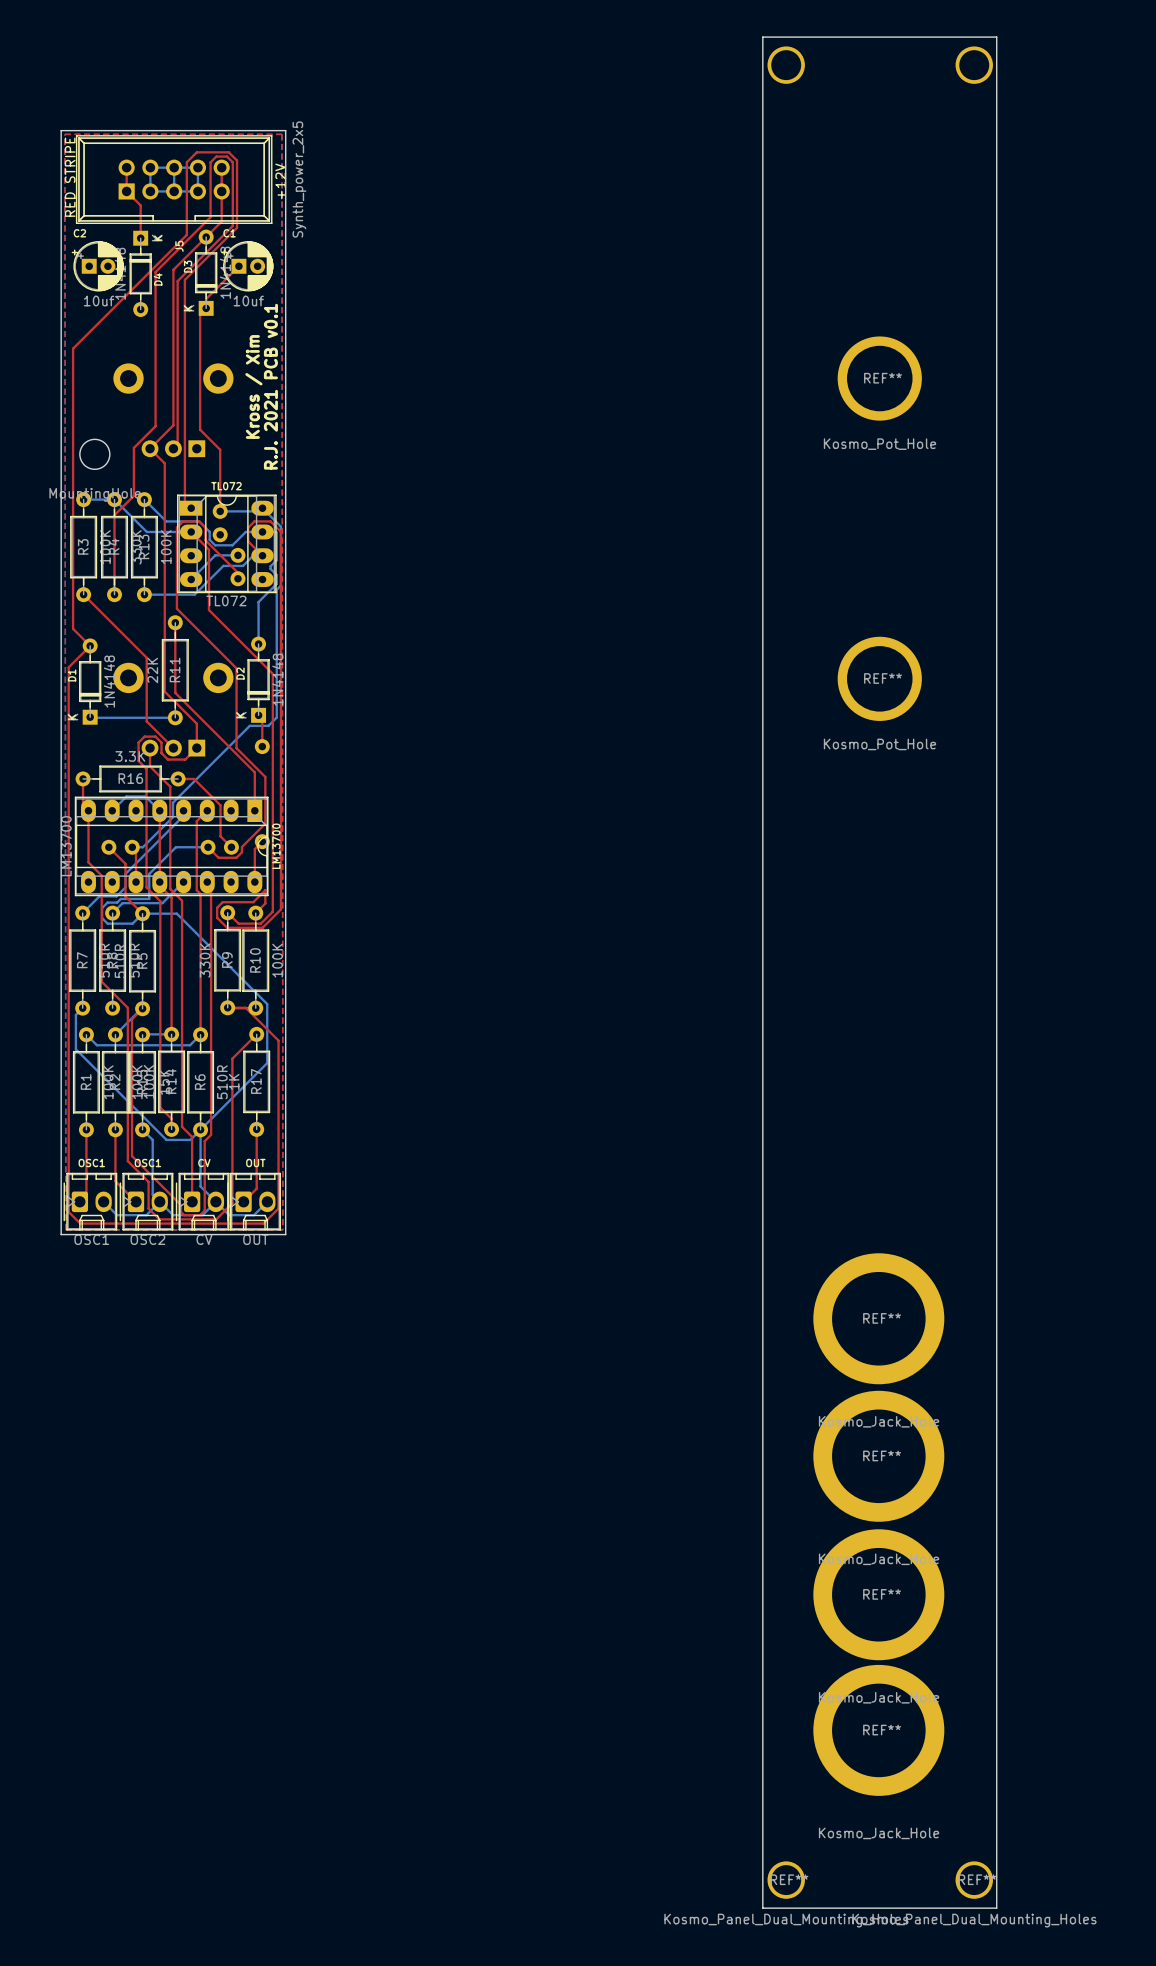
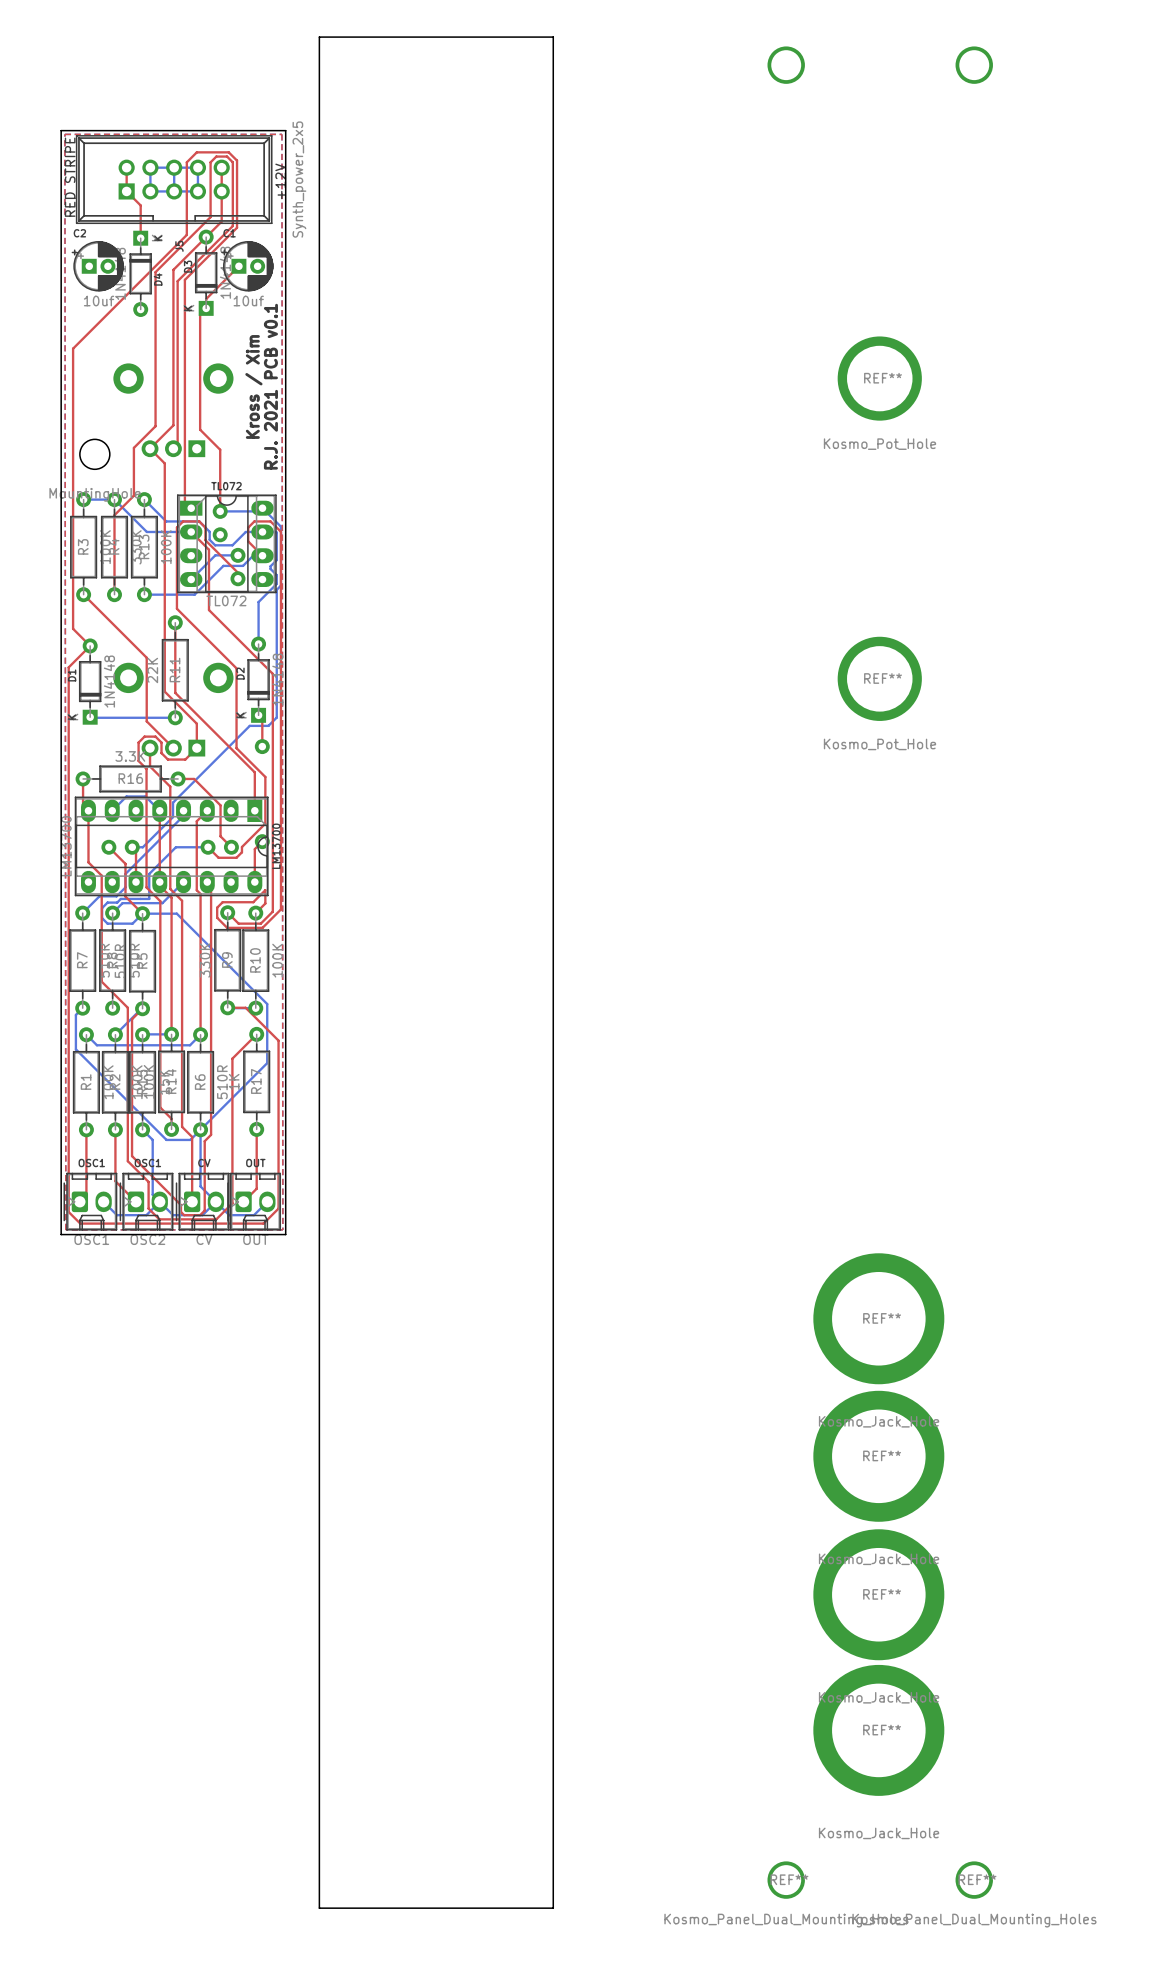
board edge: none -> (319, 37) (553, 37) (553, 1908) (319, 1908) (319, 37)
board edge: (762, 37) (996, 37) (996, 1908) (762, 1908) (762, 37) -> none

